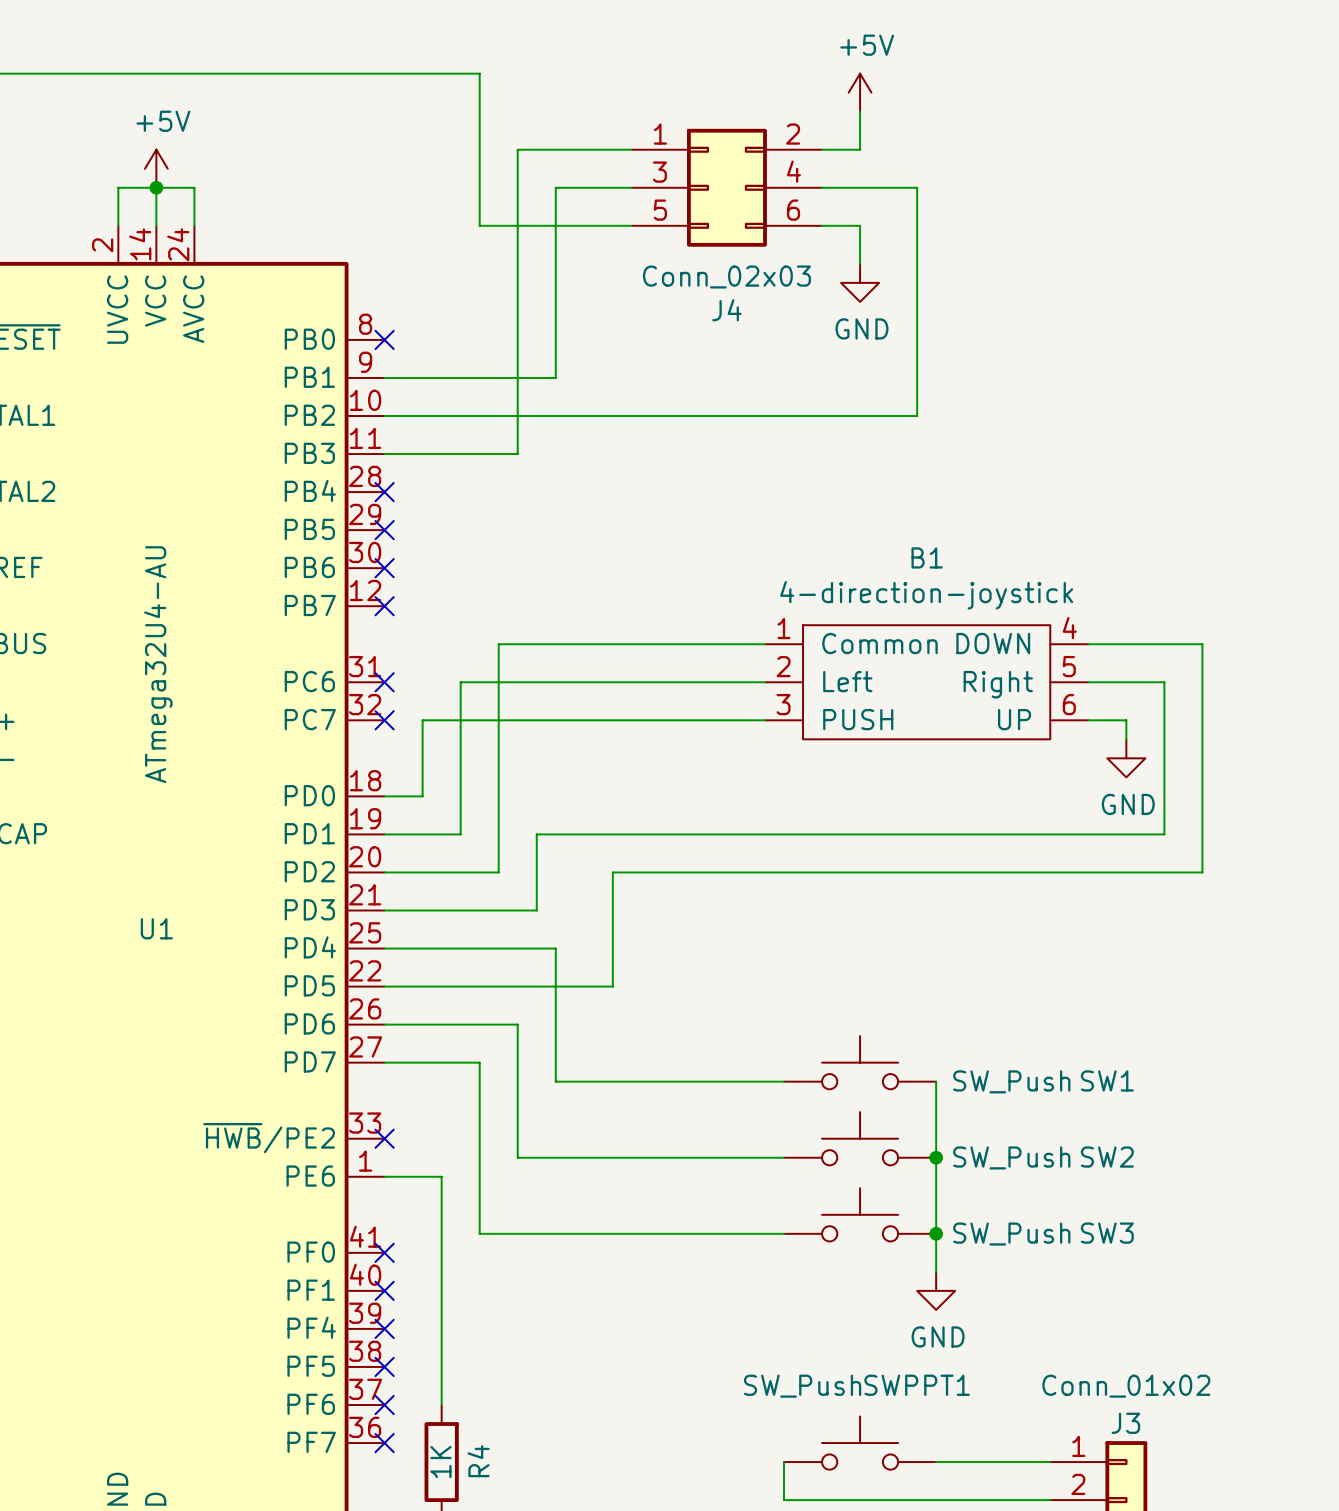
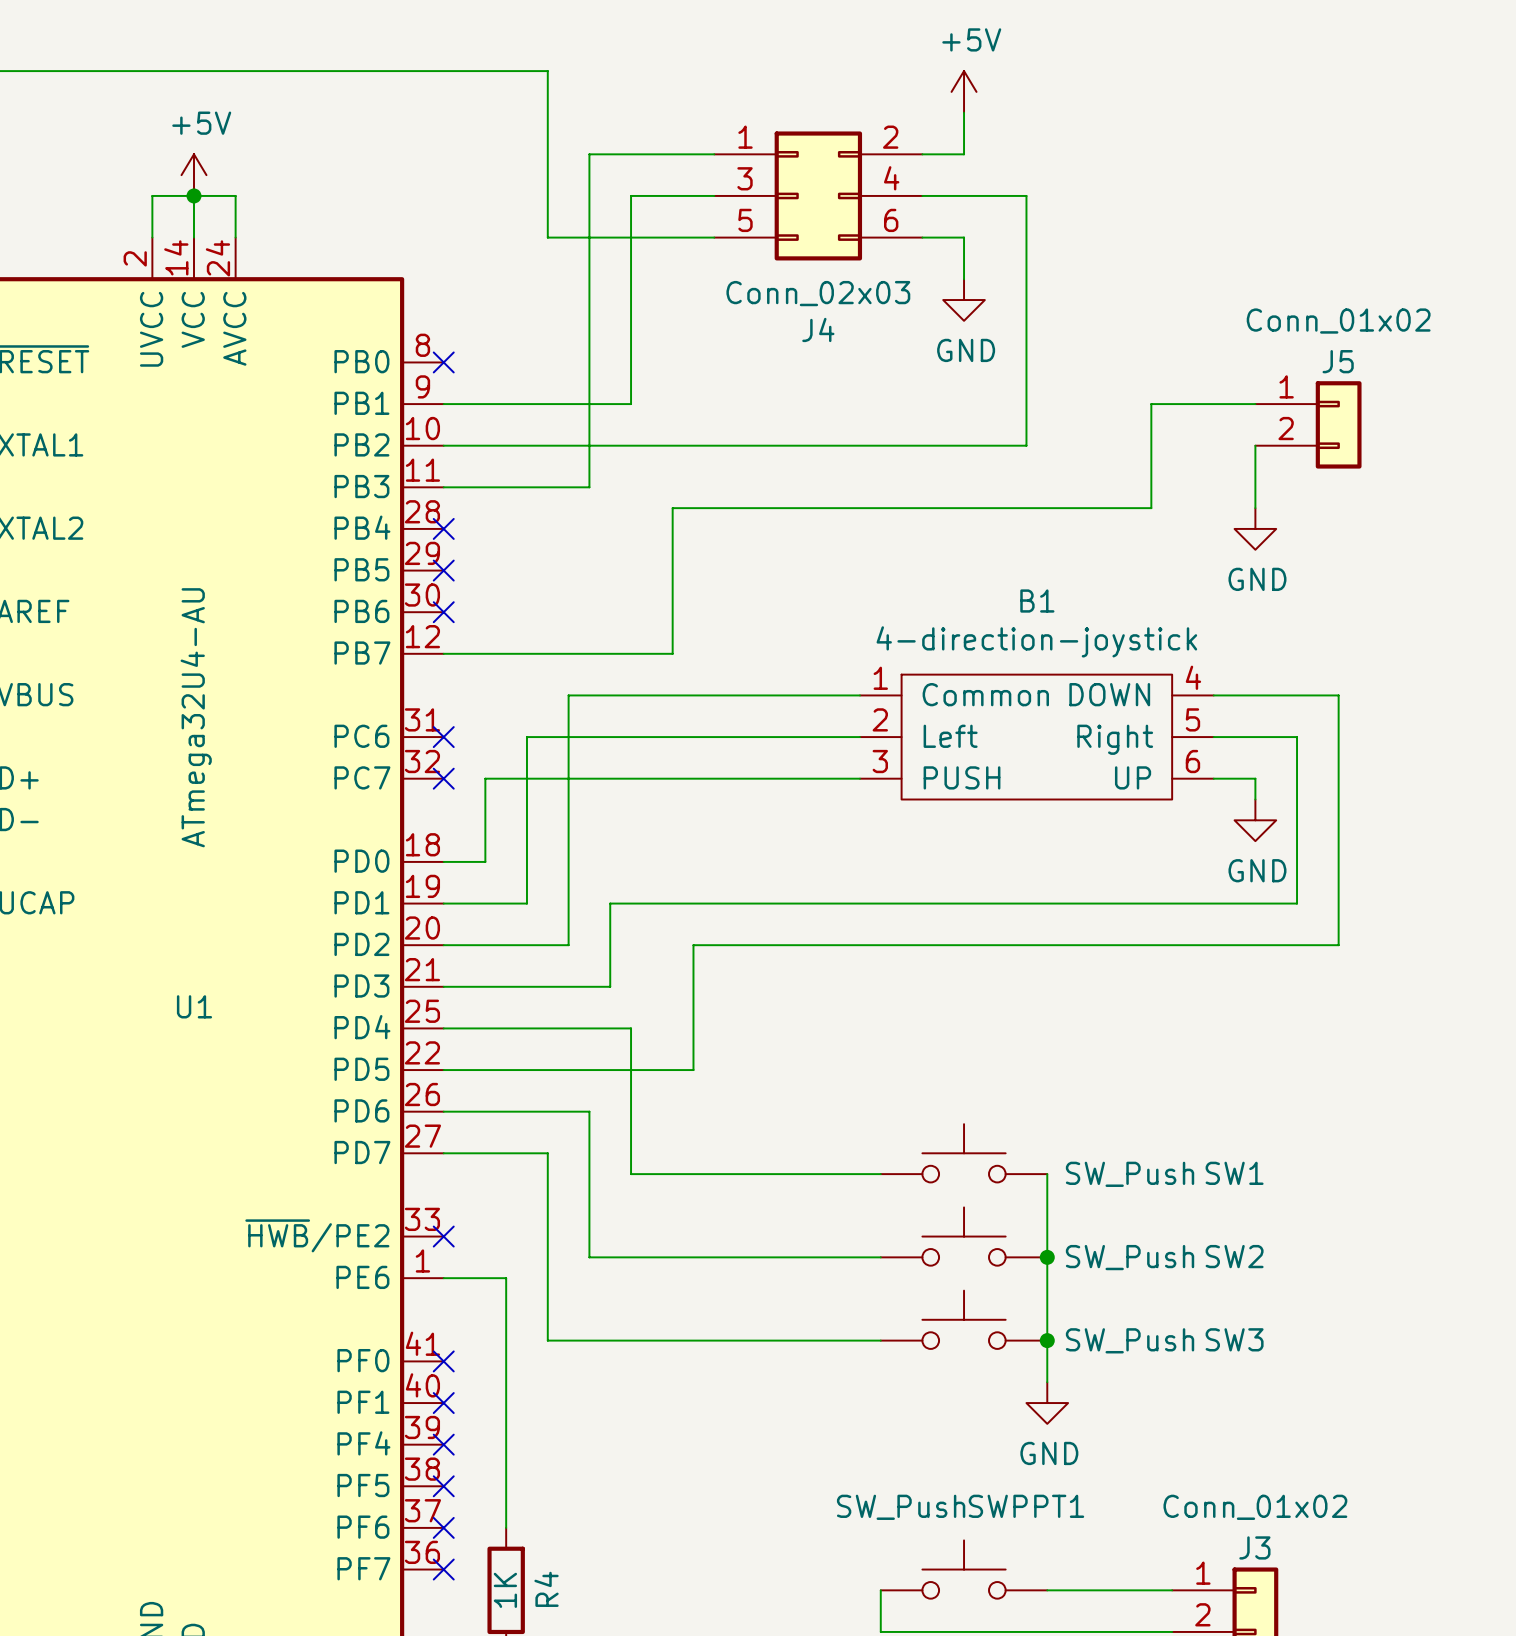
wire: none -> (1255, 404) (1151, 404) (1151, 508) (672, 508) (672, 653) (443, 653)
J5: none -> Conn_01x02 (1308, 424)
wire: none -> (1255, 445) (1255, 508)
power symbol: none -> GND (1255, 528)
no-connect mark: (384, 606) -> none

